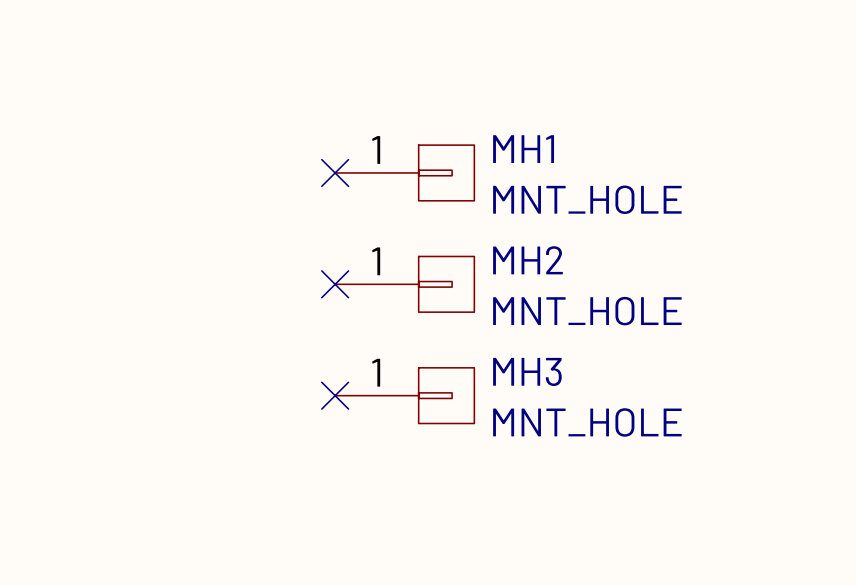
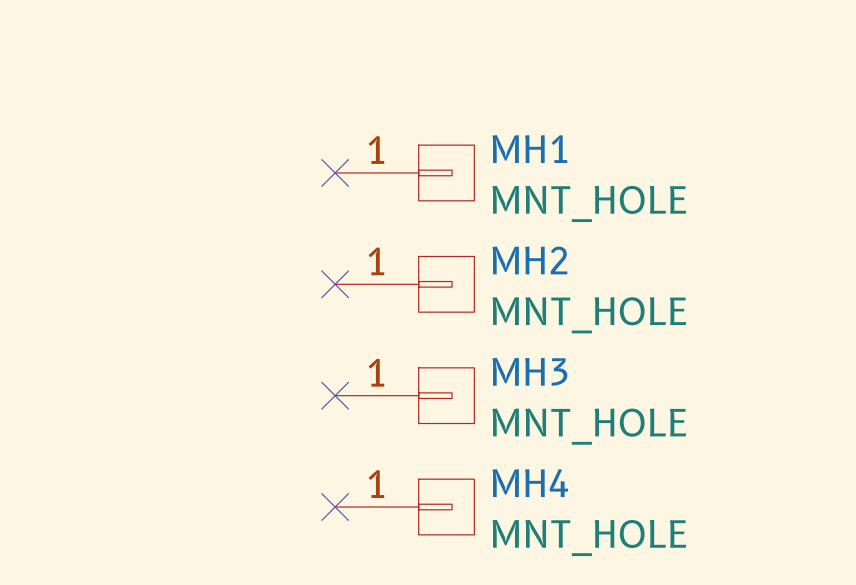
no-connect mark: none -> (335, 507)
MH4: none -> MNT_HOLE (404, 507)

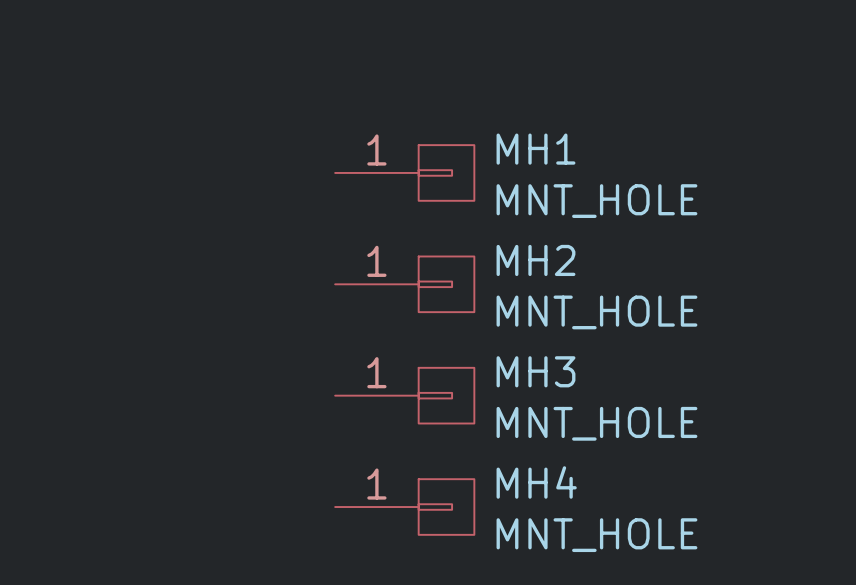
no-connect mark: (335, 172) -> none
no-connect mark: (335, 284) -> none
no-connect mark: (335, 395) -> none
no-connect mark: (335, 507) -> none

